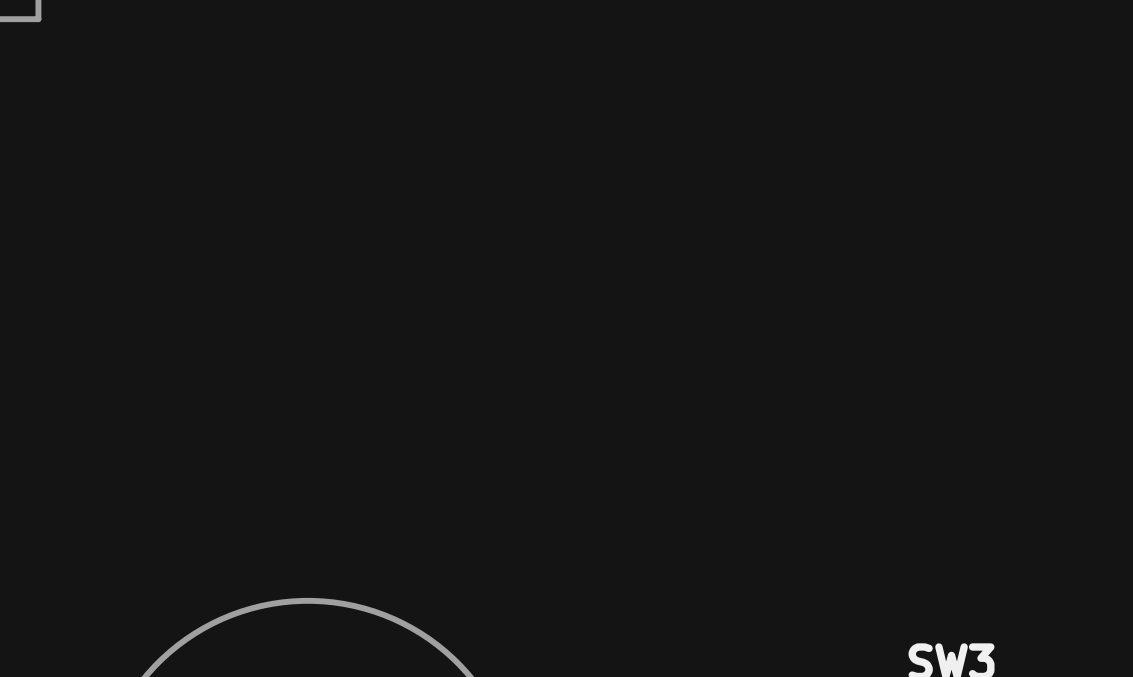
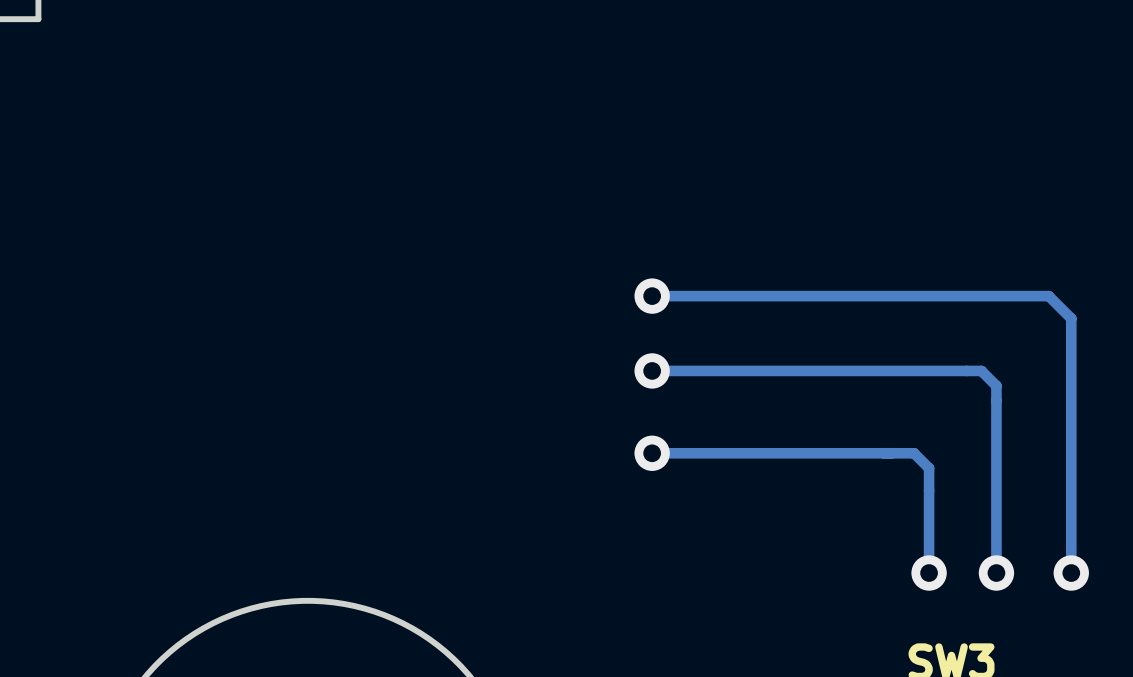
track: none -> (652, 296) (1048, 296) (1071, 318) (1071, 573)
via: none -> (652, 296)
track: none -> (652, 370) (981, 370) (996, 385) (996, 573)
via: none -> (652, 370)
track: none -> (652, 453) (914, 453) (929, 468) (929, 573)
via: none -> (652, 453)
via: none -> (929, 573)
via: none -> (996, 573)
via: none -> (1071, 573)

